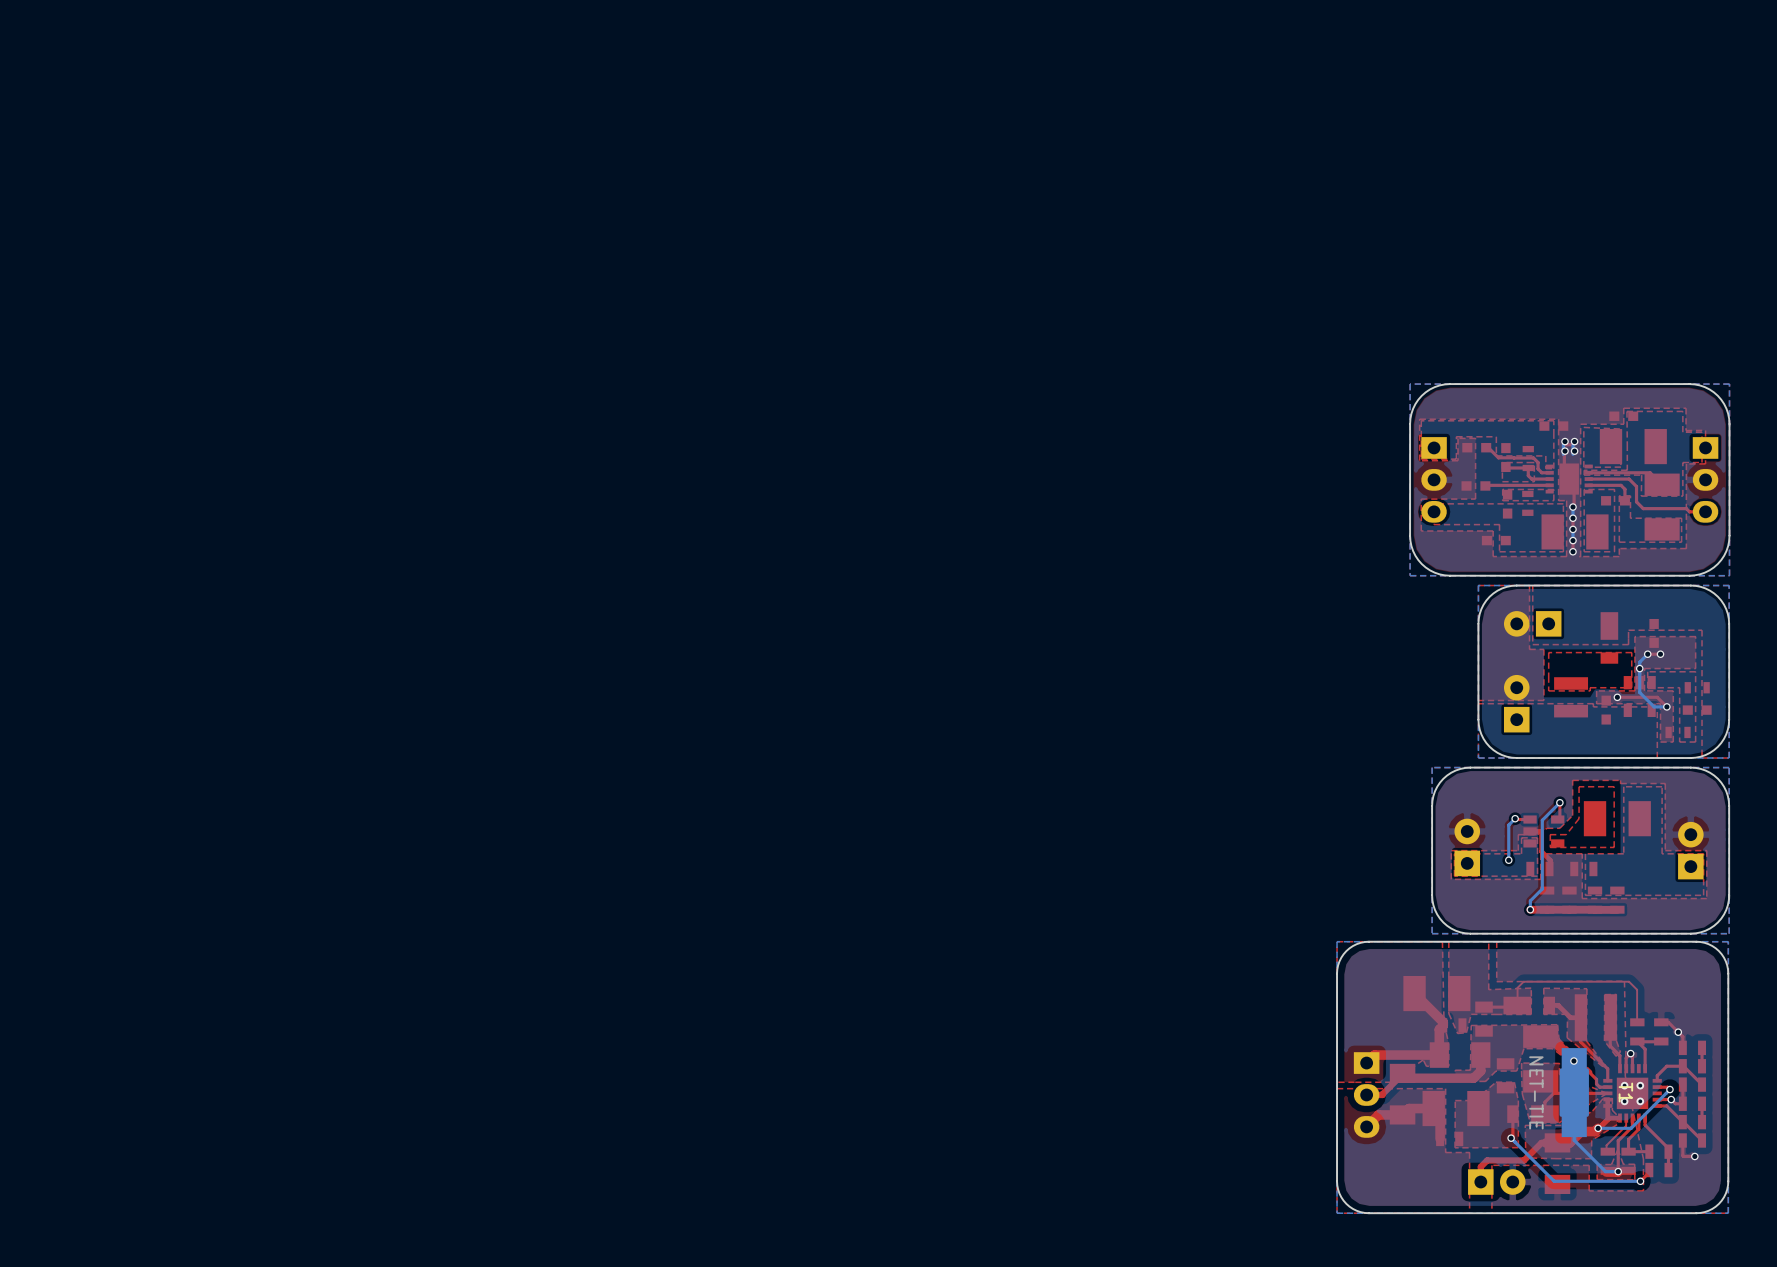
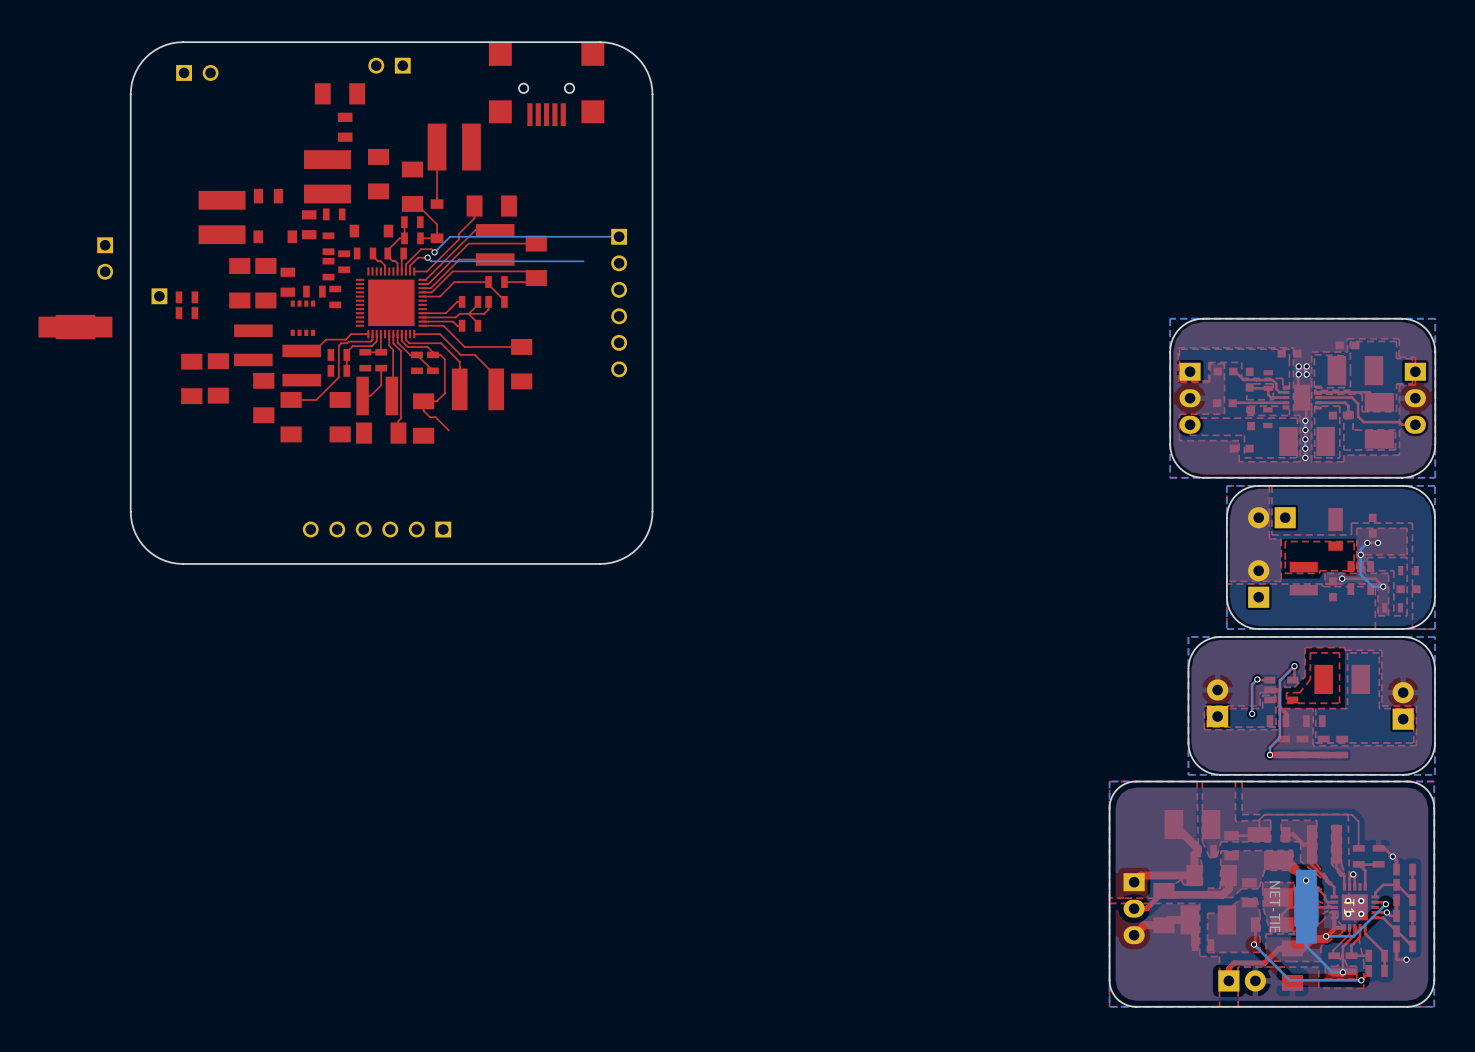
board edge: none -> (600, 42) (182, 42) (160, 47) (142, 61) (133, 77) (130, 94) (130, 511) (135, 534) (150, 552) (165, 561) (182, 563) (600, 563) (622, 558) (641, 544) (649, 529) (652, 511) (652, 88) (647, 71) (637, 57) (617, 45) (600, 42)
part: none -> (389, 65)
part: none -> (197, 72)
part: none -> (546, 84)
part: none -> (339, 93)
part: none -> (345, 127)
top track: none -> (437, 147) (437, 204)
part: none -> (454, 147)
part: none -> (378, 174)
part: none -> (327, 176)
part: none -> (412, 186)
part: none -> (268, 196)
top track: none -> (412, 203) (416, 203) (437, 224) (437, 238) (420, 238)
top track: none -> (474, 206) (474, 218) (458, 233) (458, 239) (426, 271) (414, 271)
part: none -> (491, 206)
part: none -> (334, 214)
part: none -> (222, 217)
part: none -> (437, 221)
top track: none -> (404, 222) (404, 238) (399, 238) (387, 250) (387, 256) (397, 263) (397, 271)
part: none -> (412, 222)
part: none -> (309, 224)
top track: none -> (495, 230) (475, 230) (425, 279) (422, 279)
part: none -> (371, 231)
part: none -> (275, 236)
bottom track: none -> (619, 236) (450, 236) (434, 252)
part: none -> (412, 238)
part: none -> (328, 243)
top track: none -> (536, 243) (468, 243) (428, 284) (422, 284)
part: none -> (495, 244)
top track: none -> (434, 252) (431, 249) (421, 249) (405, 264) (405, 271)
via: none -> (434, 252)
part: none -> (365, 253)
top track: none -> (372, 253) (377, 261) (385, 265) (385, 271)
part: none -> (395, 253)
top track: none -> (403, 253) (401, 255) (401, 271)
top track: none -> (427, 257) (418, 257) (410, 265) (410, 271)
bottom track: none -> (427, 257) (431, 261) (583, 261)
via: none -> (427, 257)
part: none -> (105, 258)
top track: none -> (495, 259) (459, 259) (430, 288) (422, 288)
part: none -> (536, 260)
part: none -> (344, 261)
part: none -> (328, 269)
part: none -> (496, 282)
top track: none -> (532, 282) (504, 282)
part: none -> (287, 282)
part: none -> (239, 283)
part: none -> (265, 283)
top track: none -> (529, 284) (536, 278) (529, 271) (452, 271) (431, 292) (422, 292)
part: none -> (314, 291)
part: none -> (159, 296)
part: none -> (335, 296)
top track: none -> (422, 296) (440, 296) (454, 282) (488, 282) (488, 284) (504, 301)
part: none -> (186, 297)
top track: none -> (462, 301) (457, 301) (445, 313) (422, 313)
part: none -> (470, 301)
top track: none -> (477, 301) (477, 304) (468, 313) (477, 323) (477, 325)
top track: none -> (488, 301) (488, 309) (484, 313) (459, 313) (455, 317) (422, 317)
part: none -> (496, 301)
part: none -> (391, 302)
part: none -> (619, 303)
part: none -> (186, 312)
part: none -> (302, 318)
top track: none -> (422, 321) (452, 321) (457, 325) (462, 325)
top track: none -> (422, 325) (443, 325) (464, 346) (521, 346)
part: none -> (470, 325)
part: none -> (75, 327)
top track: none -> (368, 334) (351, 334) (345, 339) (326, 339) (314, 350) (301, 350)
top track: none -> (372, 334) (370, 341) (348, 341) (338, 345) (338, 377) (316, 399) (291, 399)
top track: none -> (376, 334) (376, 341) (372, 346) (352, 346) (346, 352) (346, 370)
top track: none -> (380, 334) (381, 352) (366, 352)
top track: none -> (389, 334) (389, 345) (393, 349) (391, 395)
top track: none -> (393, 334) (393, 343) (400, 350) (400, 418) (398, 420) (398, 433)
top track: none -> (397, 334) (397, 342) (410, 354) (417, 354) (432, 370)
top track: none -> (401, 334) (401, 340) (407, 346) (427, 346) (432, 354) (440, 354) (444, 359) (444, 393) (436, 401) (423, 401) (423, 410) (429, 417) (435, 417) (448, 430)
top track: none -> (405, 334) (405, 339) (409, 343) (441, 343) (459, 361) (459, 389)
top track: none -> (414, 334) (439, 334) (460, 354) (474, 354) (496, 376) (496, 389)
part: none -> (253, 345)
part: none -> (338, 354)
part: none -> (365, 360)
part: none -> (381, 360)
part: none -> (417, 362)
part: none -> (432, 362)
part: none -> (521, 364)
part: none -> (301, 365)
top track: none -> (381, 368) (381, 385) (370, 395) (362, 395)
part: none -> (338, 370)
part: none -> (191, 378)
part: none -> (218, 378)
part: none -> (477, 389)
part: none -> (377, 395)
part: none -> (263, 398)
part: none -> (291, 417)
part: none -> (340, 417)
part: none -> (423, 418)
part: none -> (381, 433)
part: none -> (377, 529)

